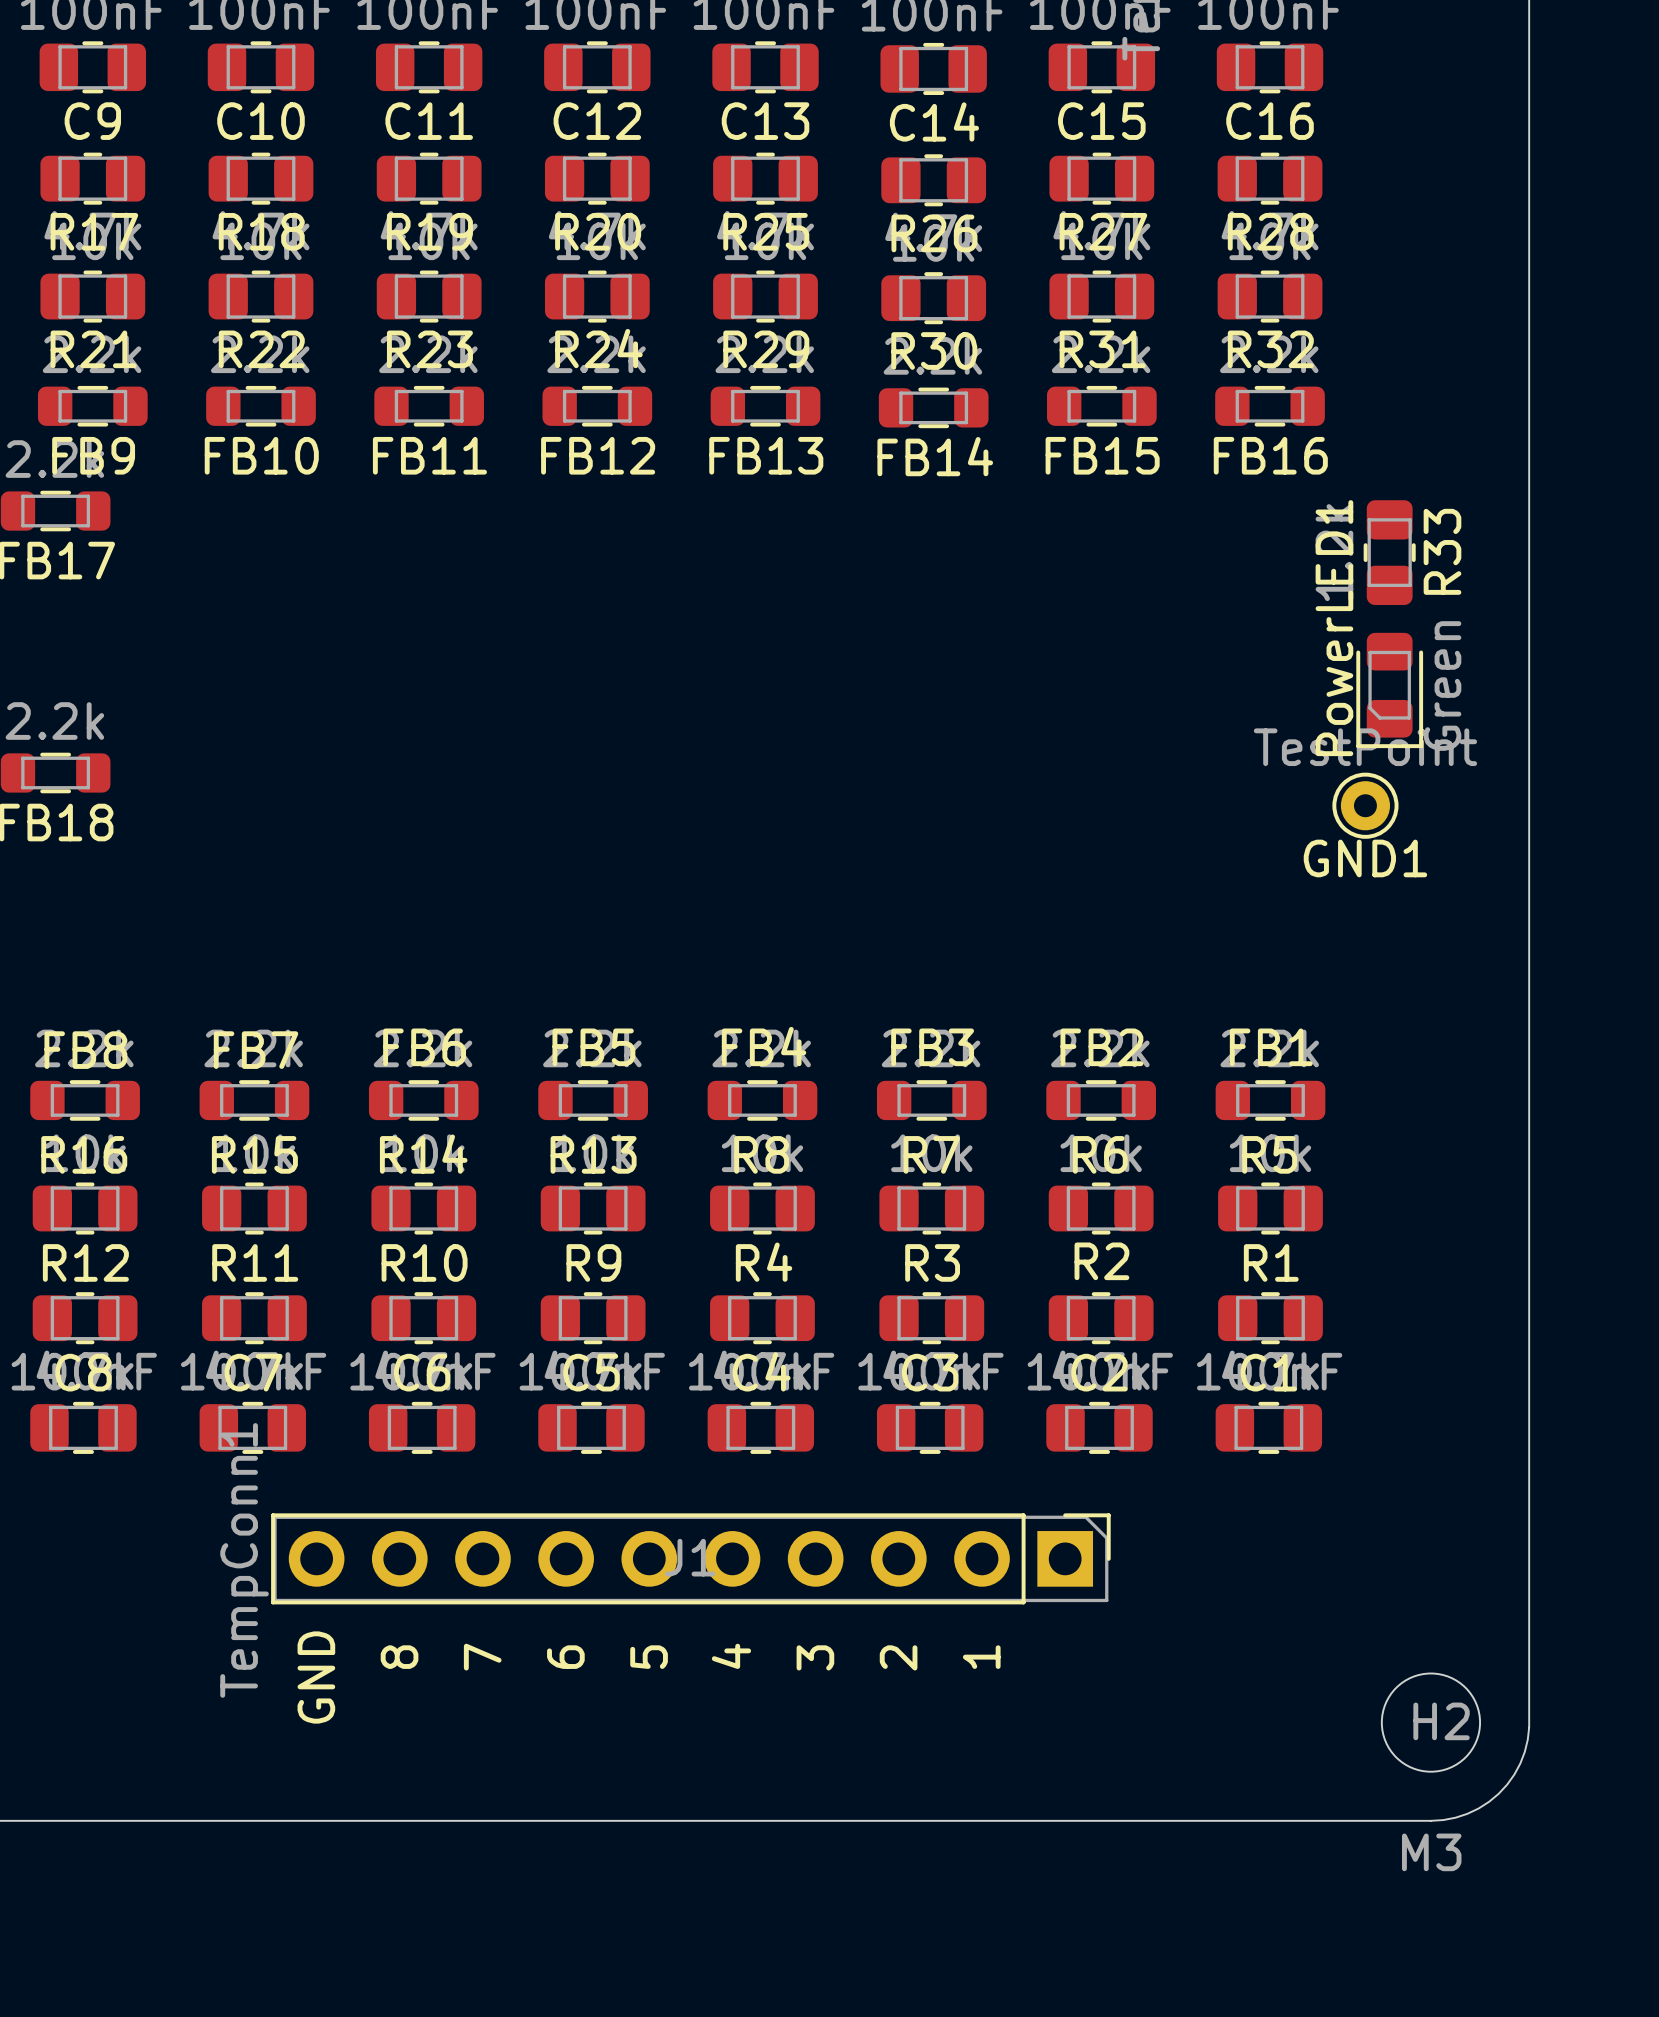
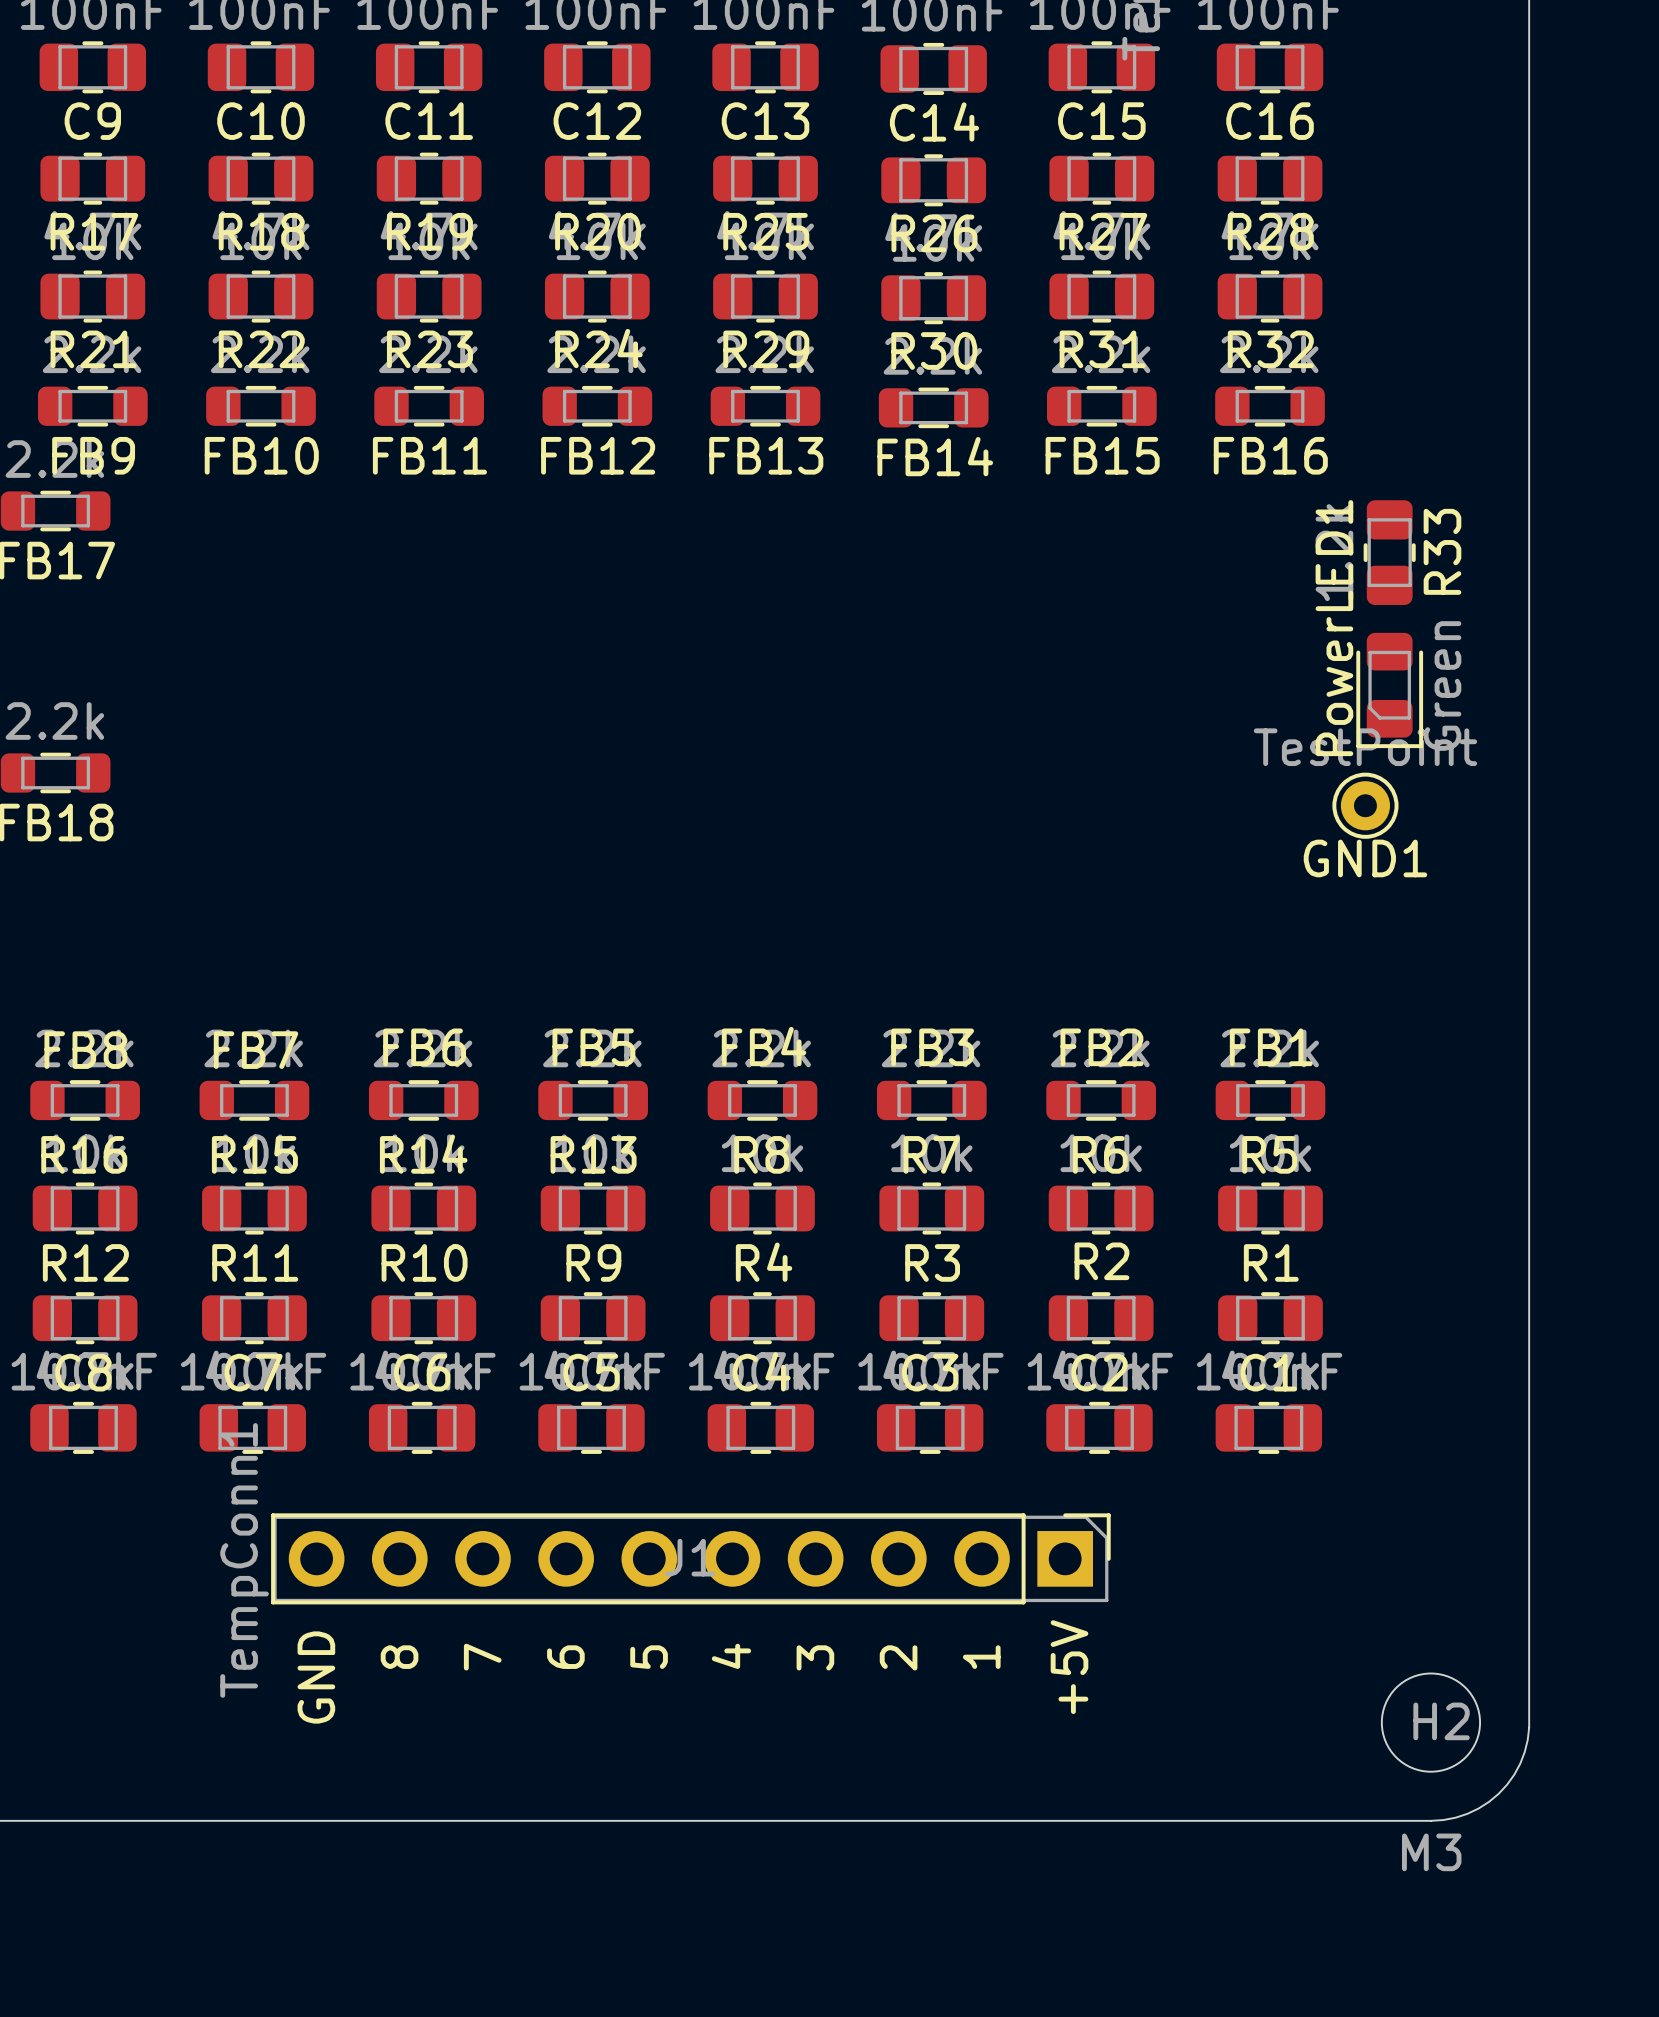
text: none -> +5V (1069, 1667)

